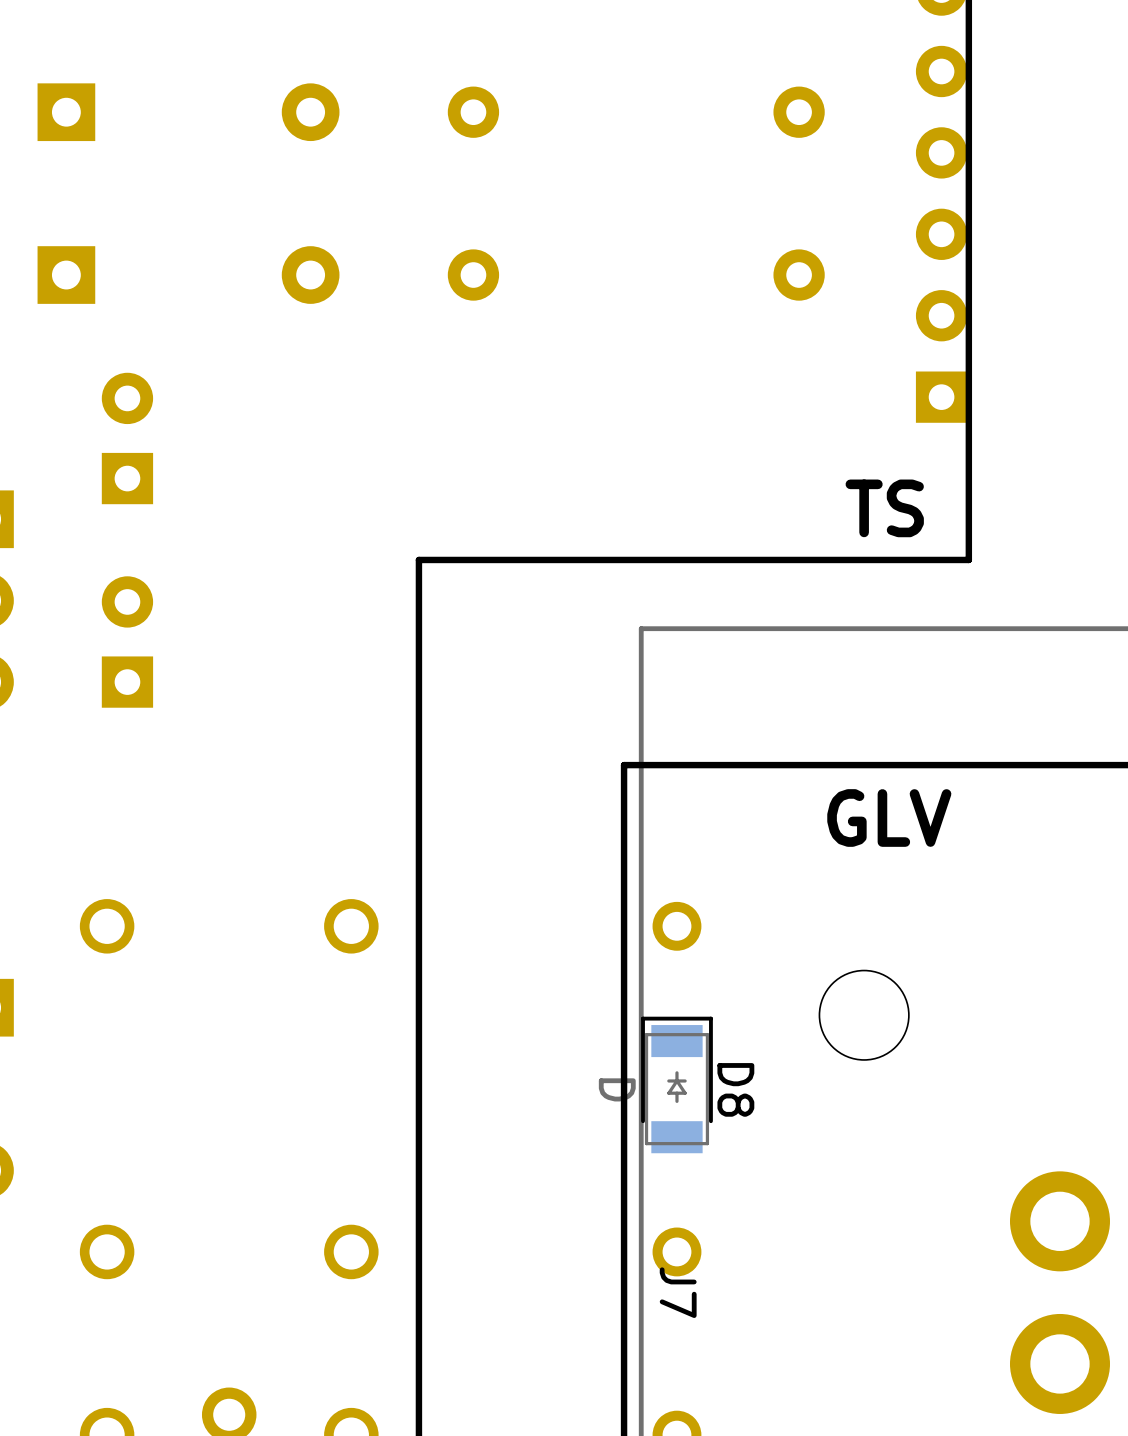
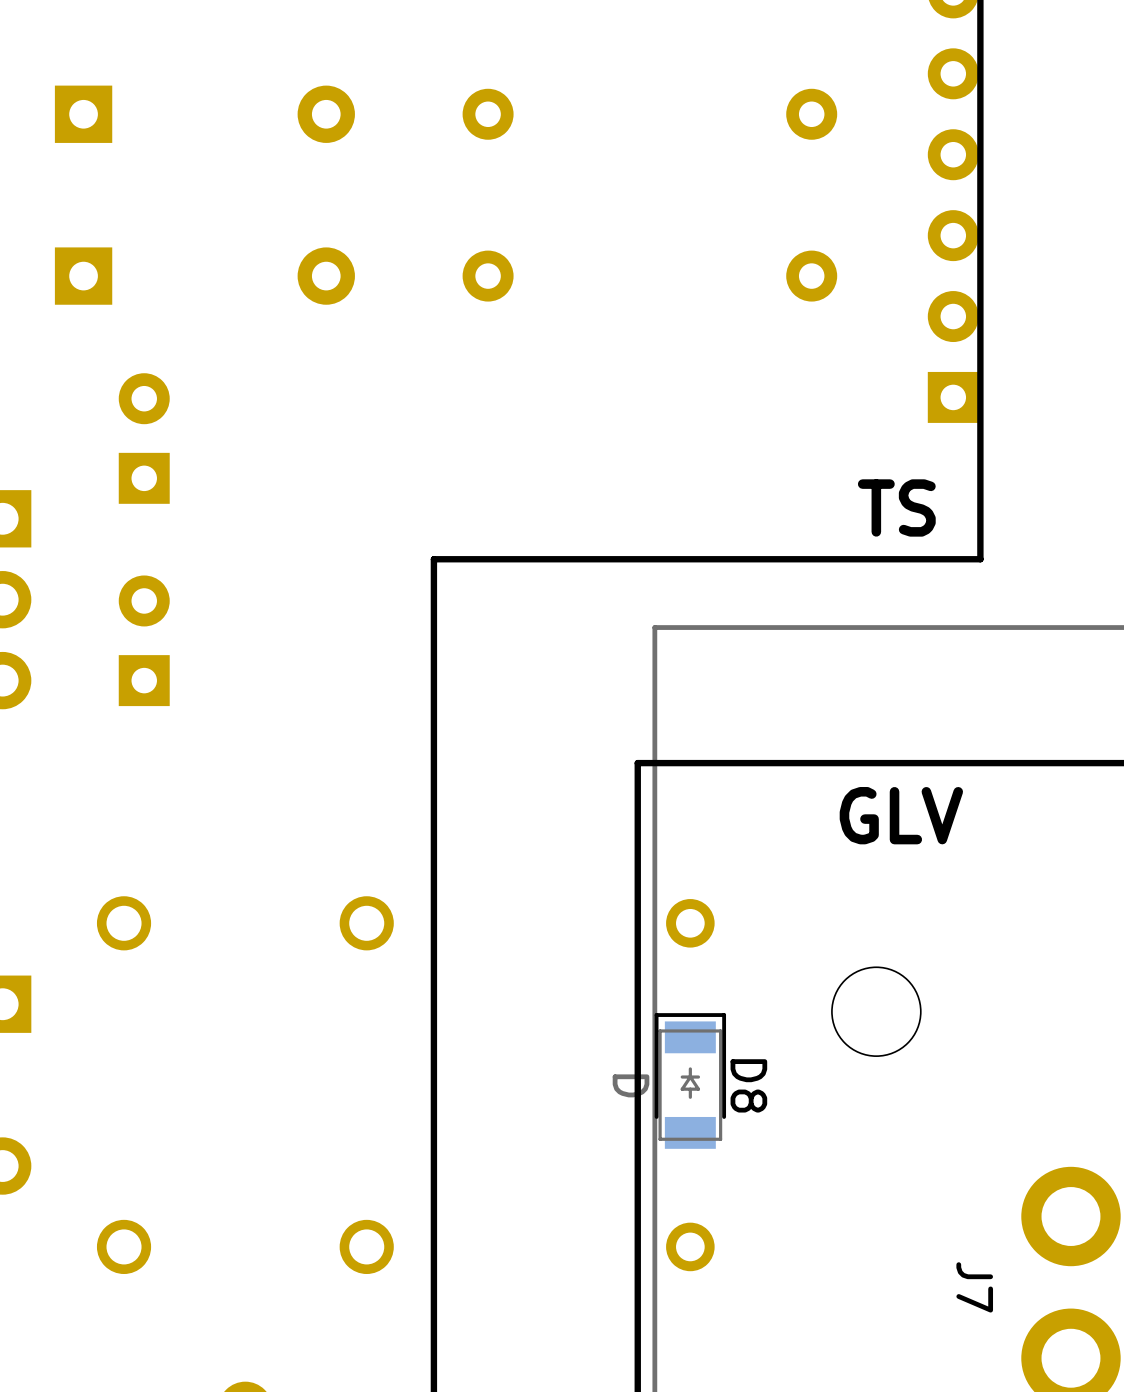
J7 name position: J7 (678, 1292) -> J7 (974, 1287)

